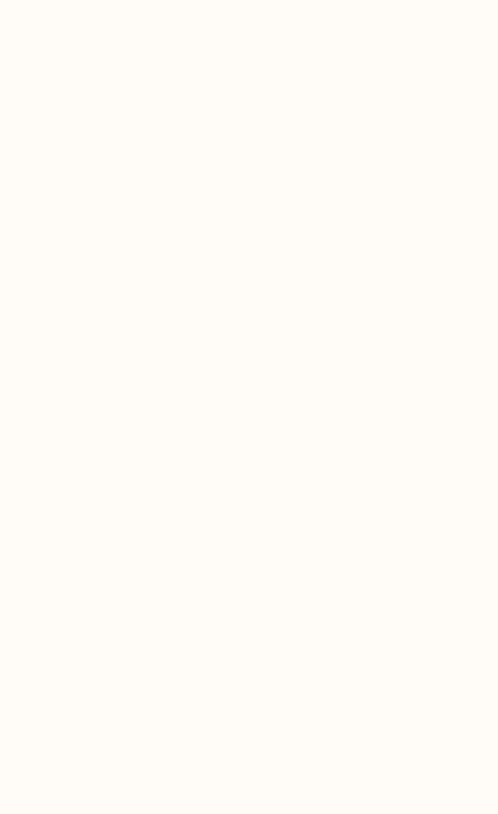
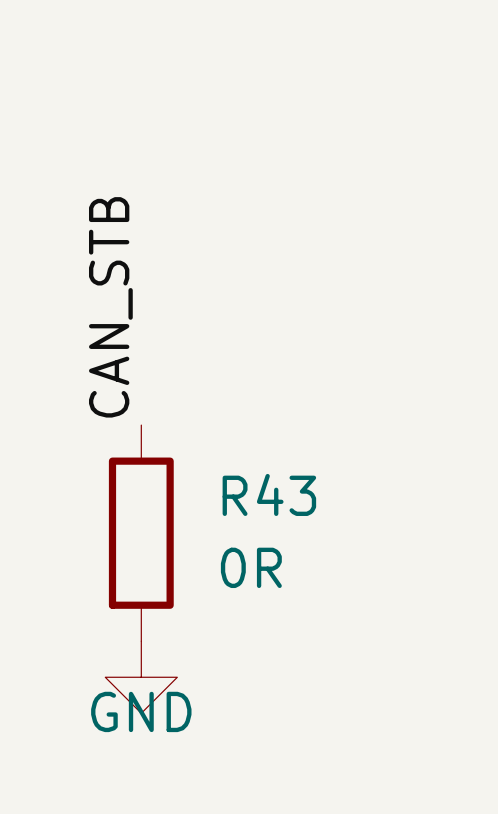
label: none -> CAN_STB (110, 307)
R43: none -> 0R (141, 533)
power symbol: none -> GND (141, 677)

